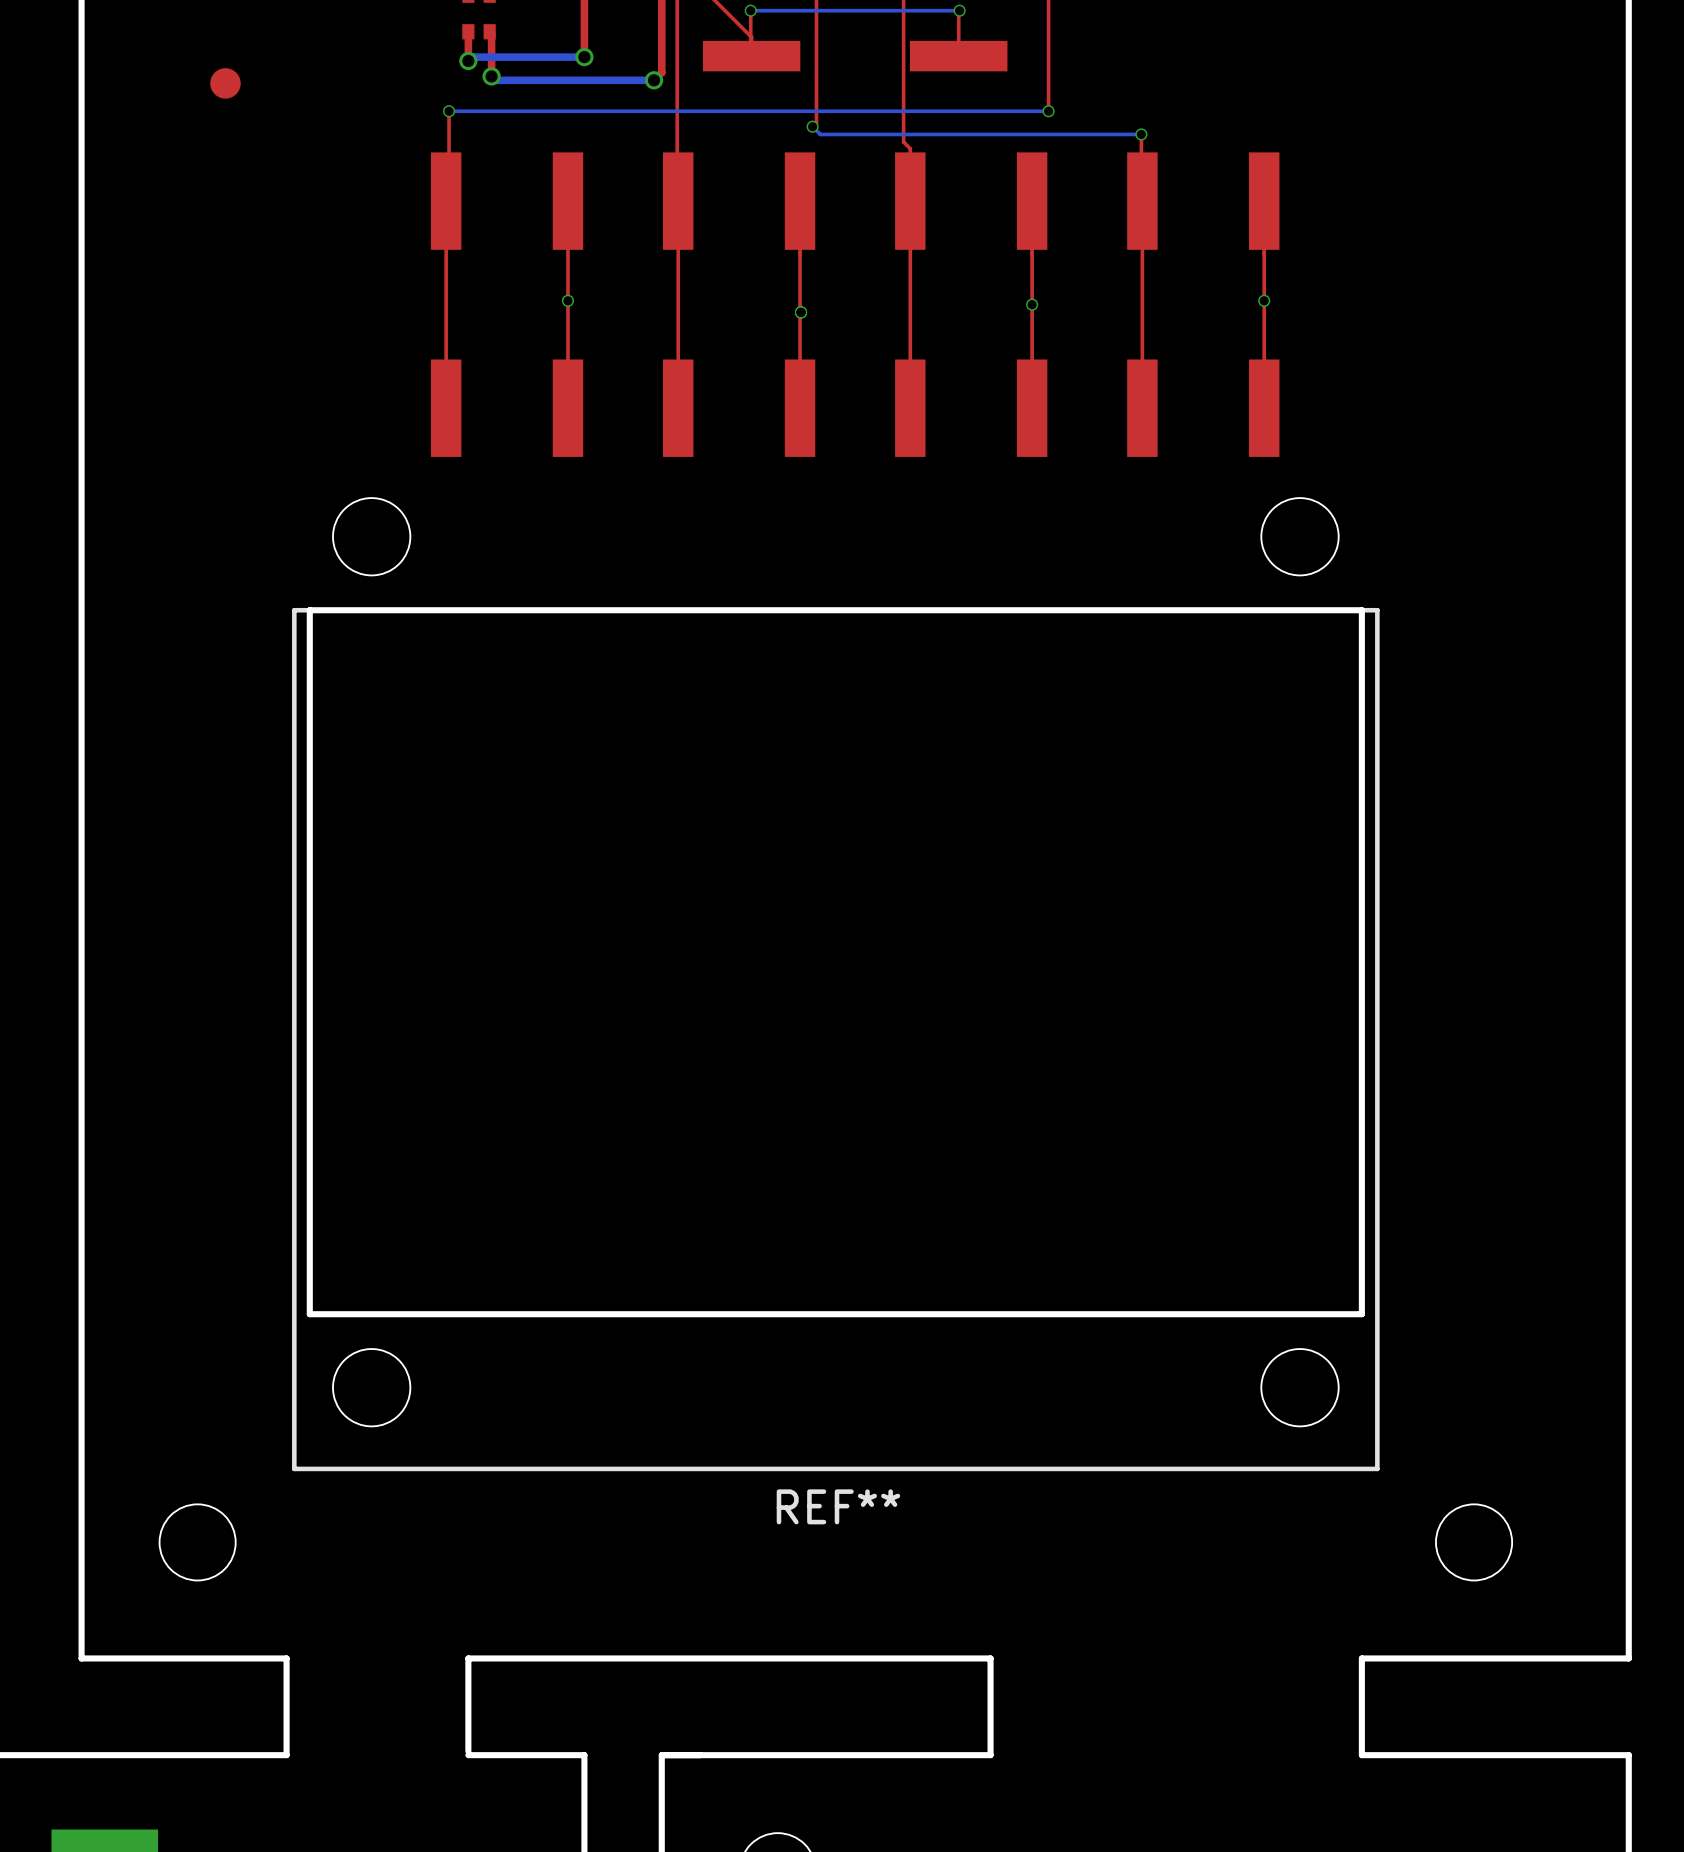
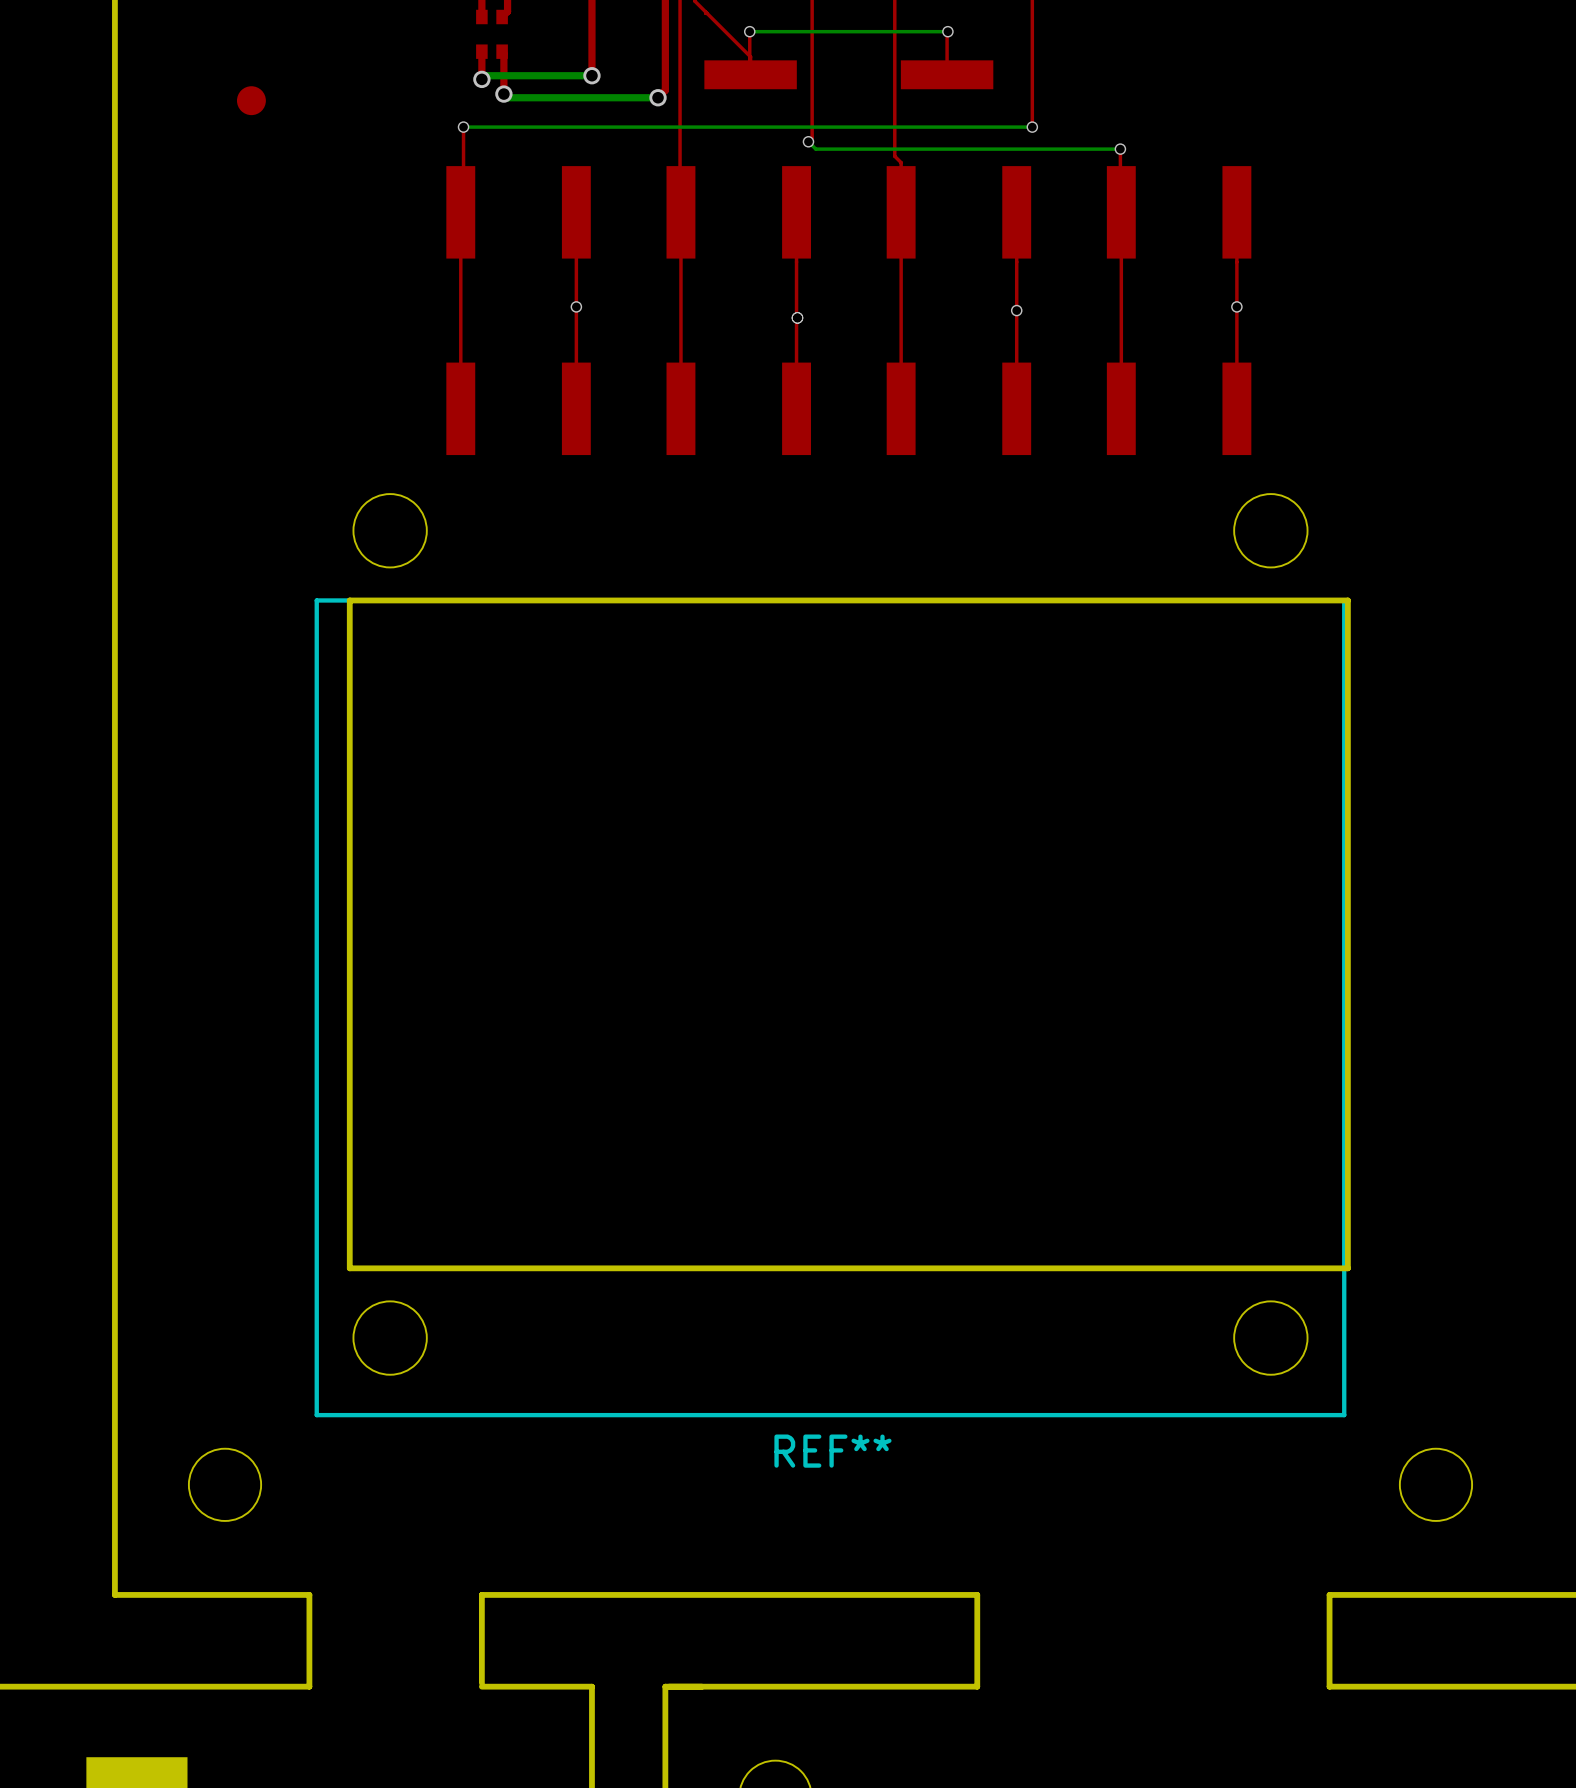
board edge: (329, 610) (309, 610) (309, 1314) (329, 1314) -> (349, 600) (349, 1268)
board edge: (1361, 610) (1361, 1314) -> (1329, 600) (1347, 600) (1347, 1268) (1329, 1268)

